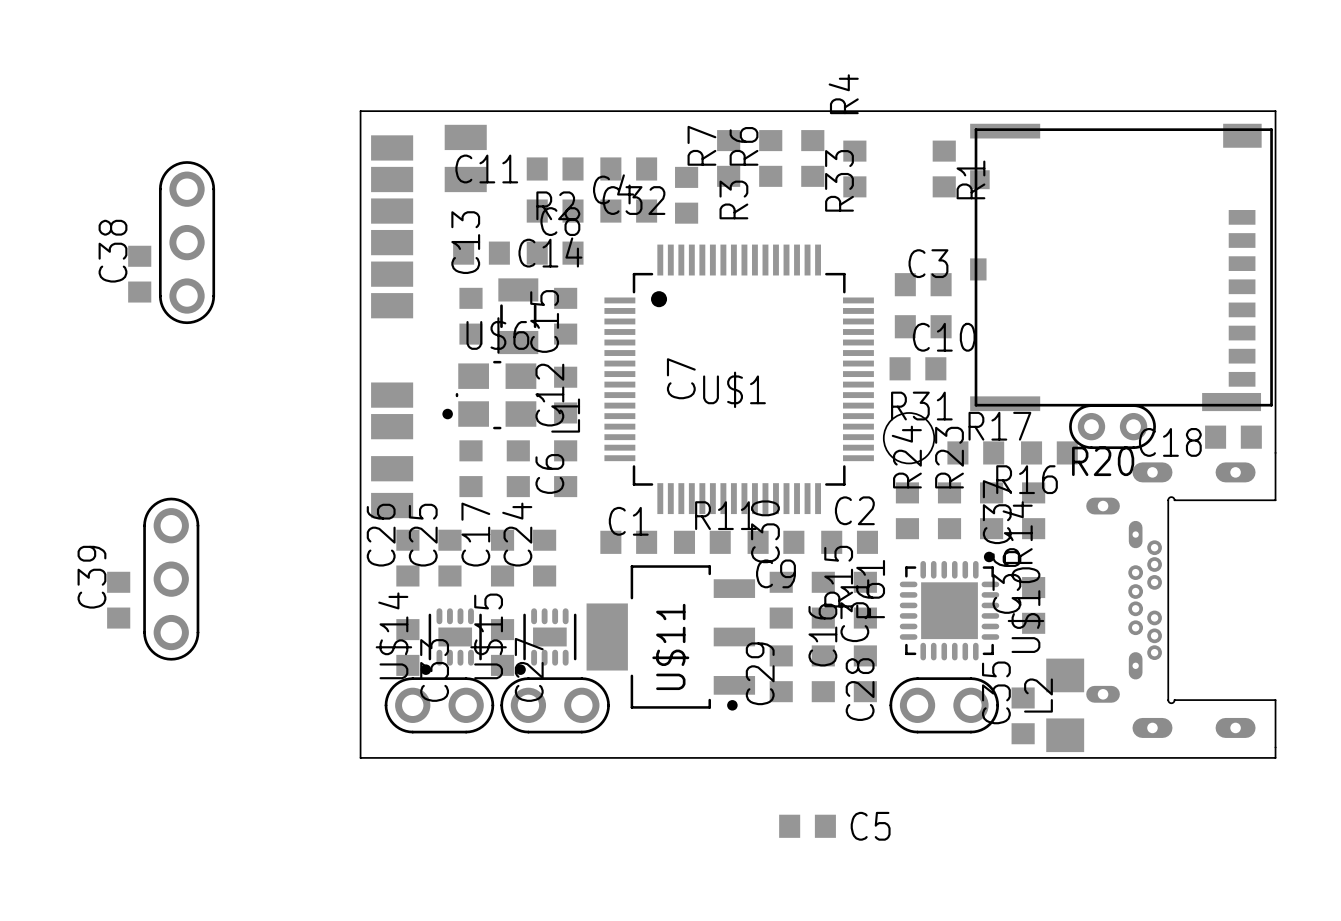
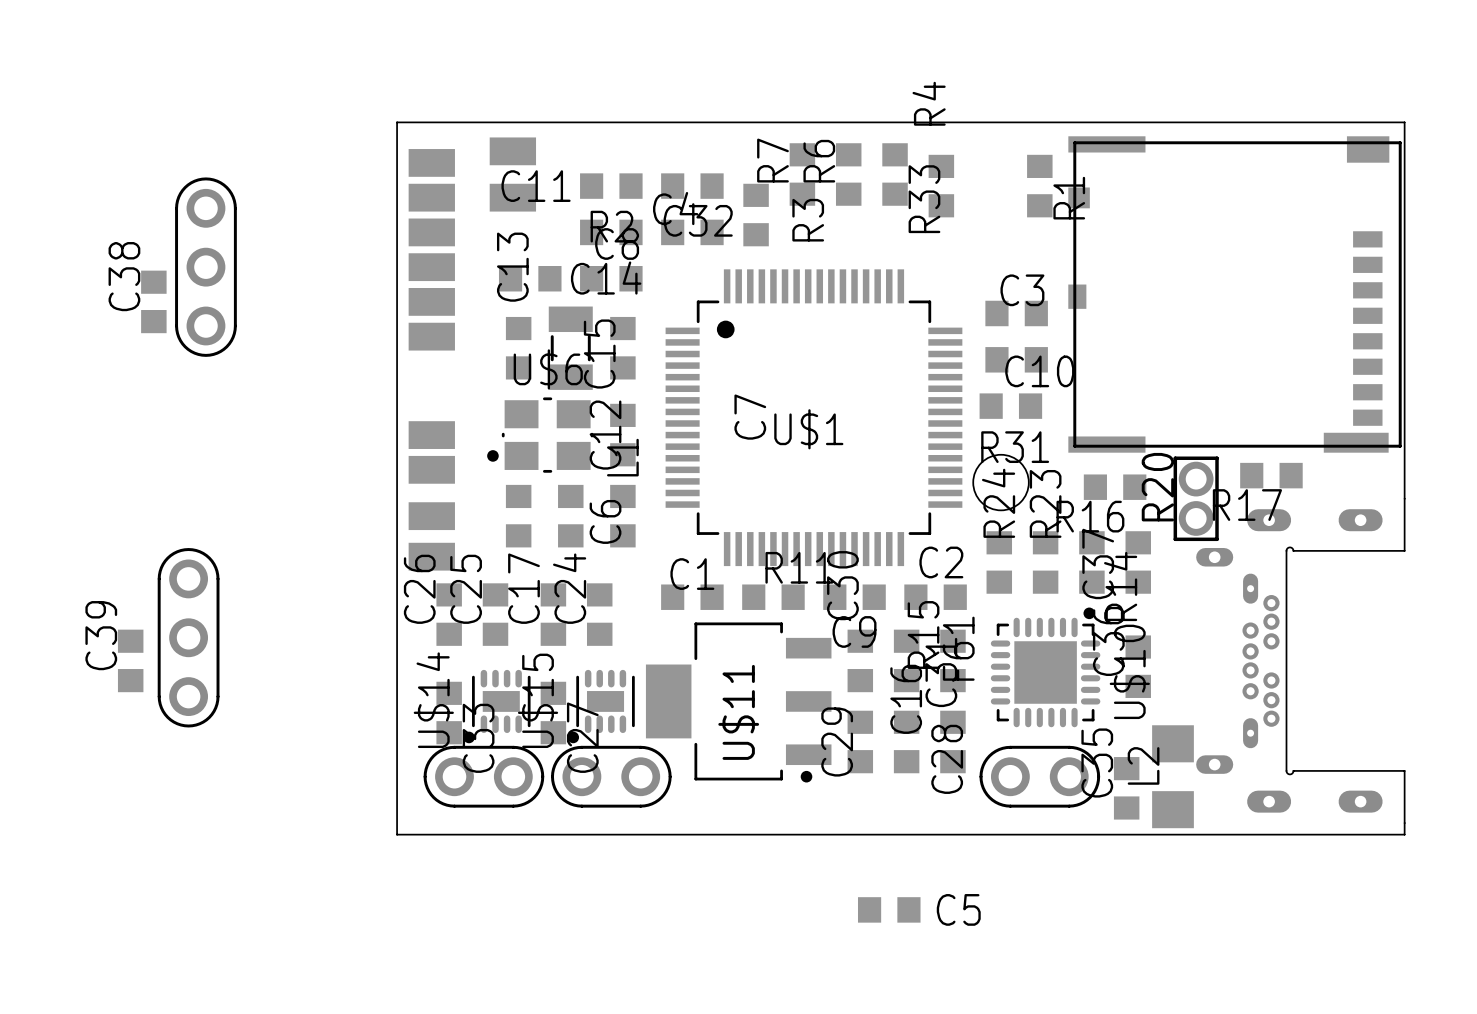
R20 footprint: [1069, 404, 1156, 450] -> [1173, 456, 1219, 542]
R17 name position: R17 (999, 426) -> R17 (1247, 505)
C18: (1233, 437) -> none
R17 position: (975, 452) -> (1271, 475)
R16 position: (1049, 452) -> (1115, 487)
R20 name position: R20 (1103, 461) -> R20 (1157, 487)

